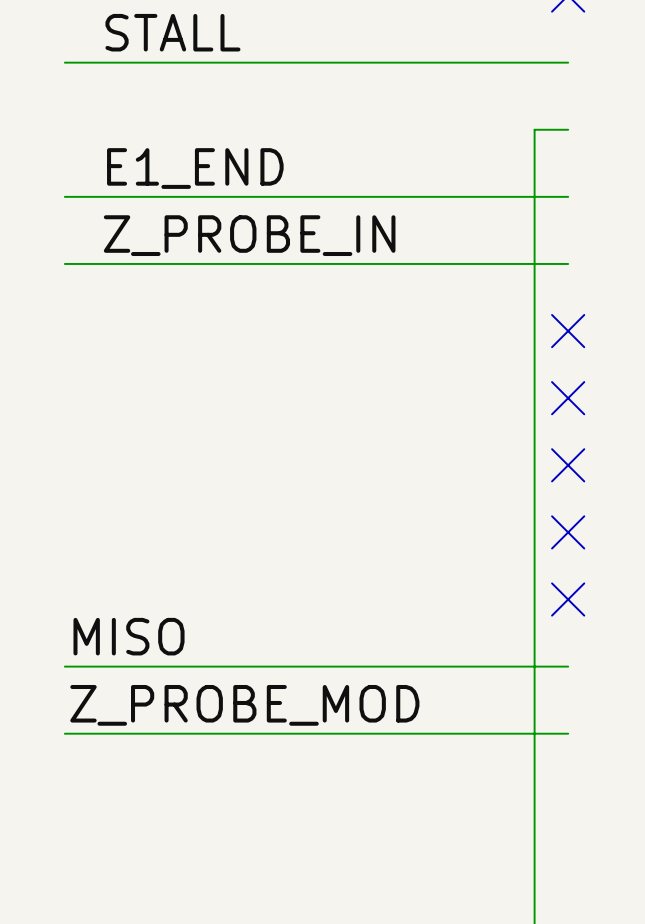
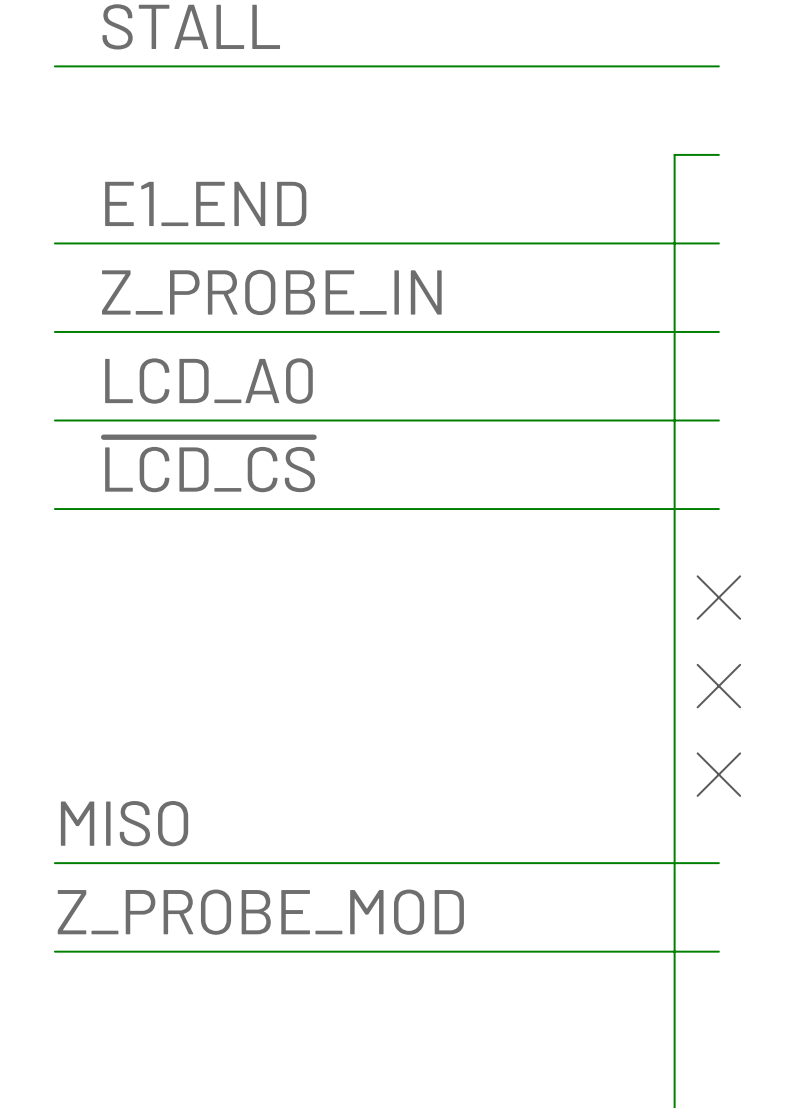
label: none -> LCD_A0 (208, 381)
wire: none -> (54, 420) (718, 420)
no-connect mark: (568, 331) -> none
label: none -> ~{LCD_CS} (209, 464)
wire: none -> (54, 509) (718, 509)
no-connect mark: (568, 398) -> none

